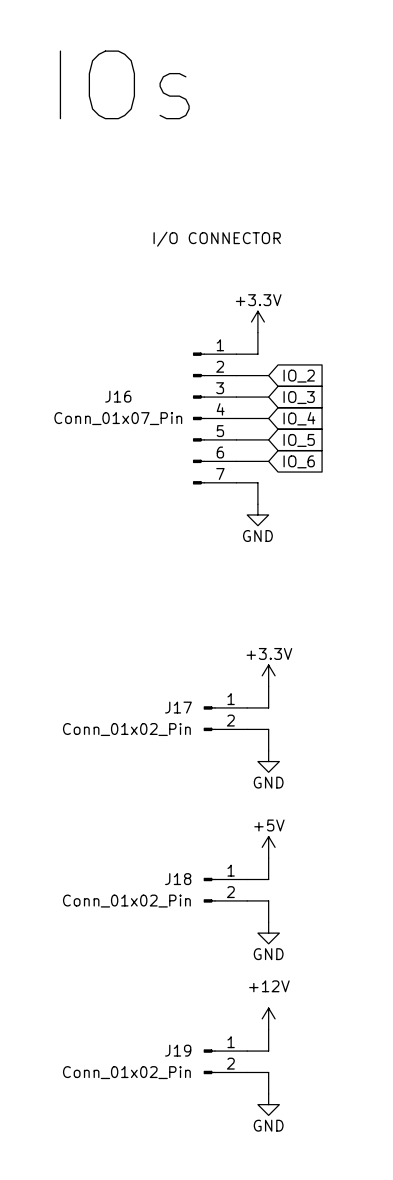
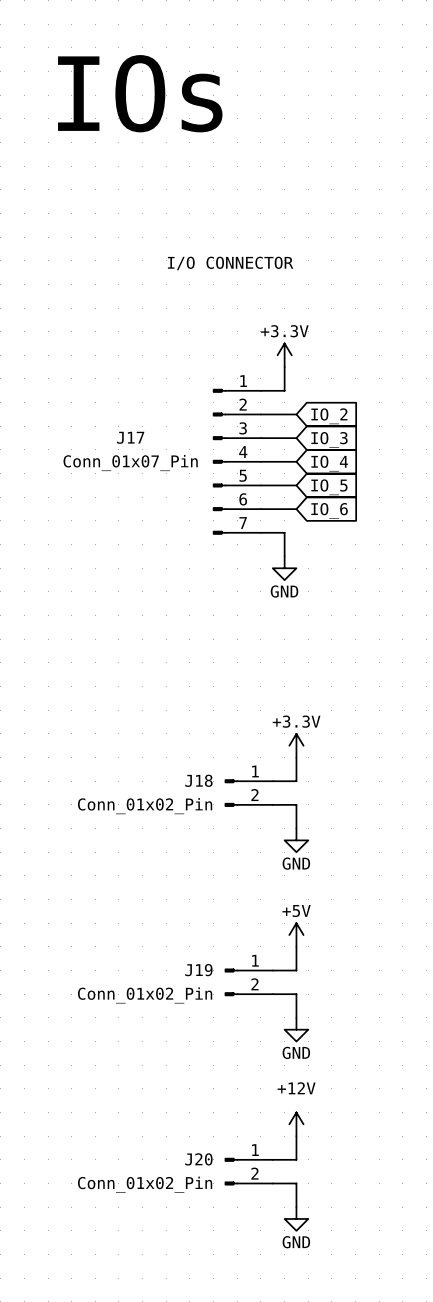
J16 name: J16 (118, 396) -> J17 (130, 437)
J17 name: J17 (178, 707) -> J18 (198, 780)
J18 name: J18 (178, 879) -> J19 (198, 970)
J19 name: J19 (178, 1050) -> J20 (198, 1159)

